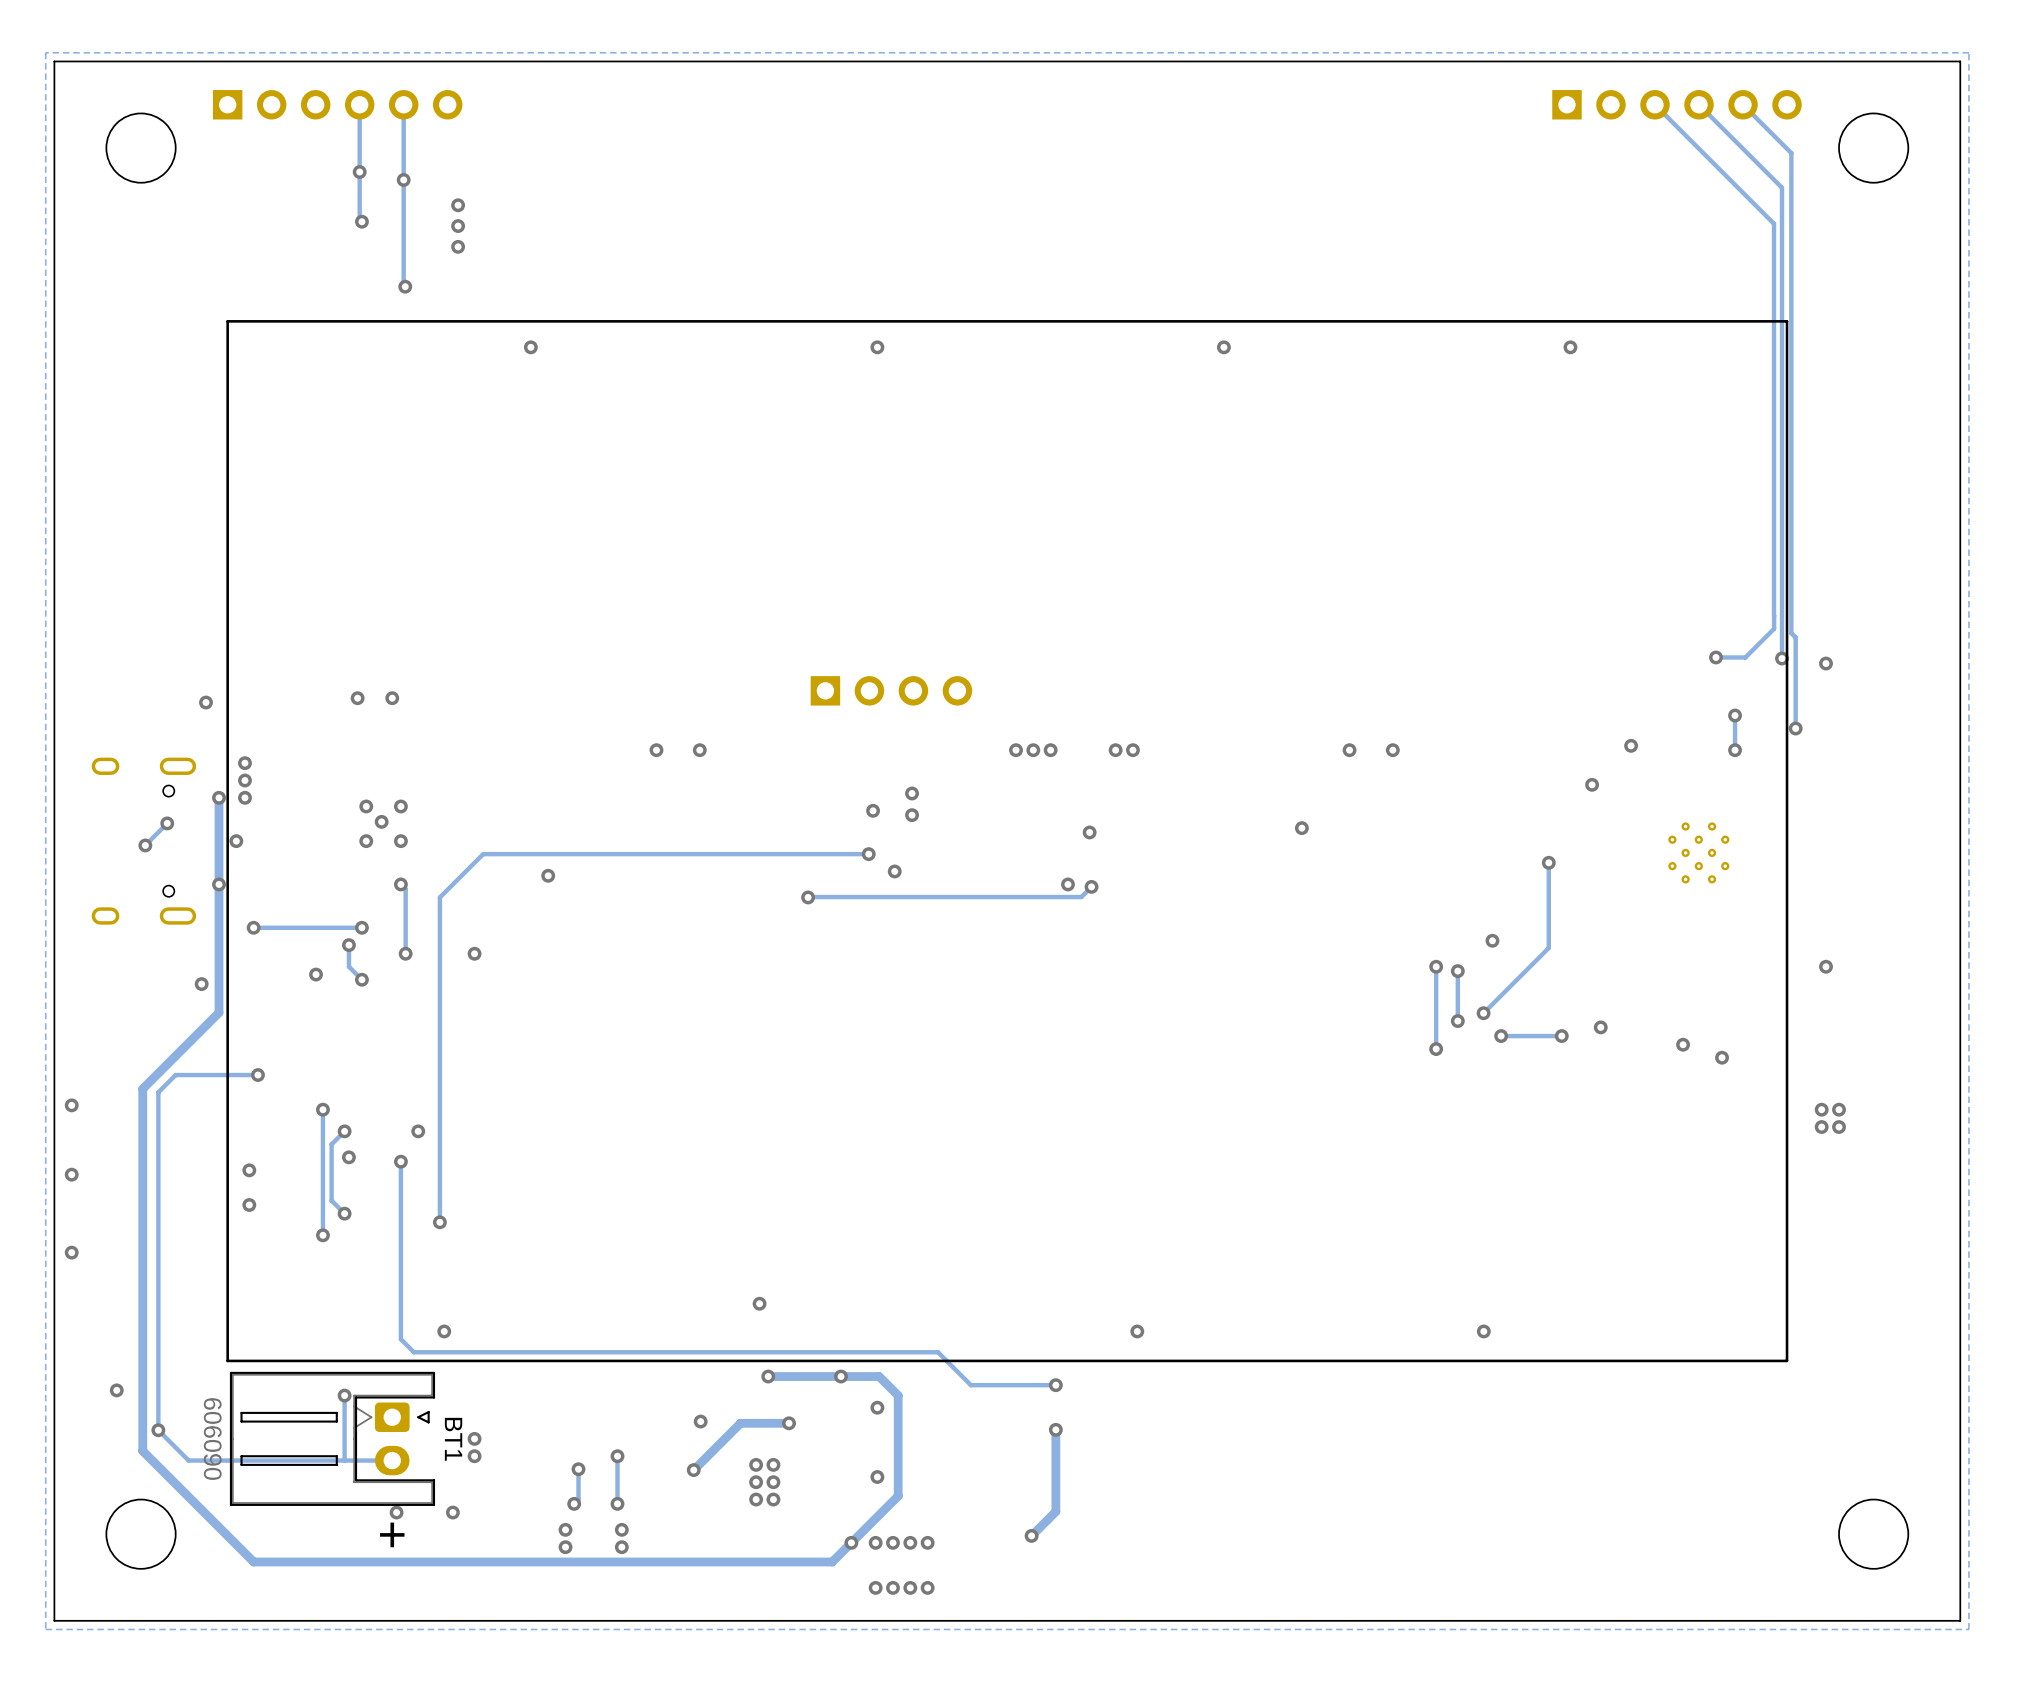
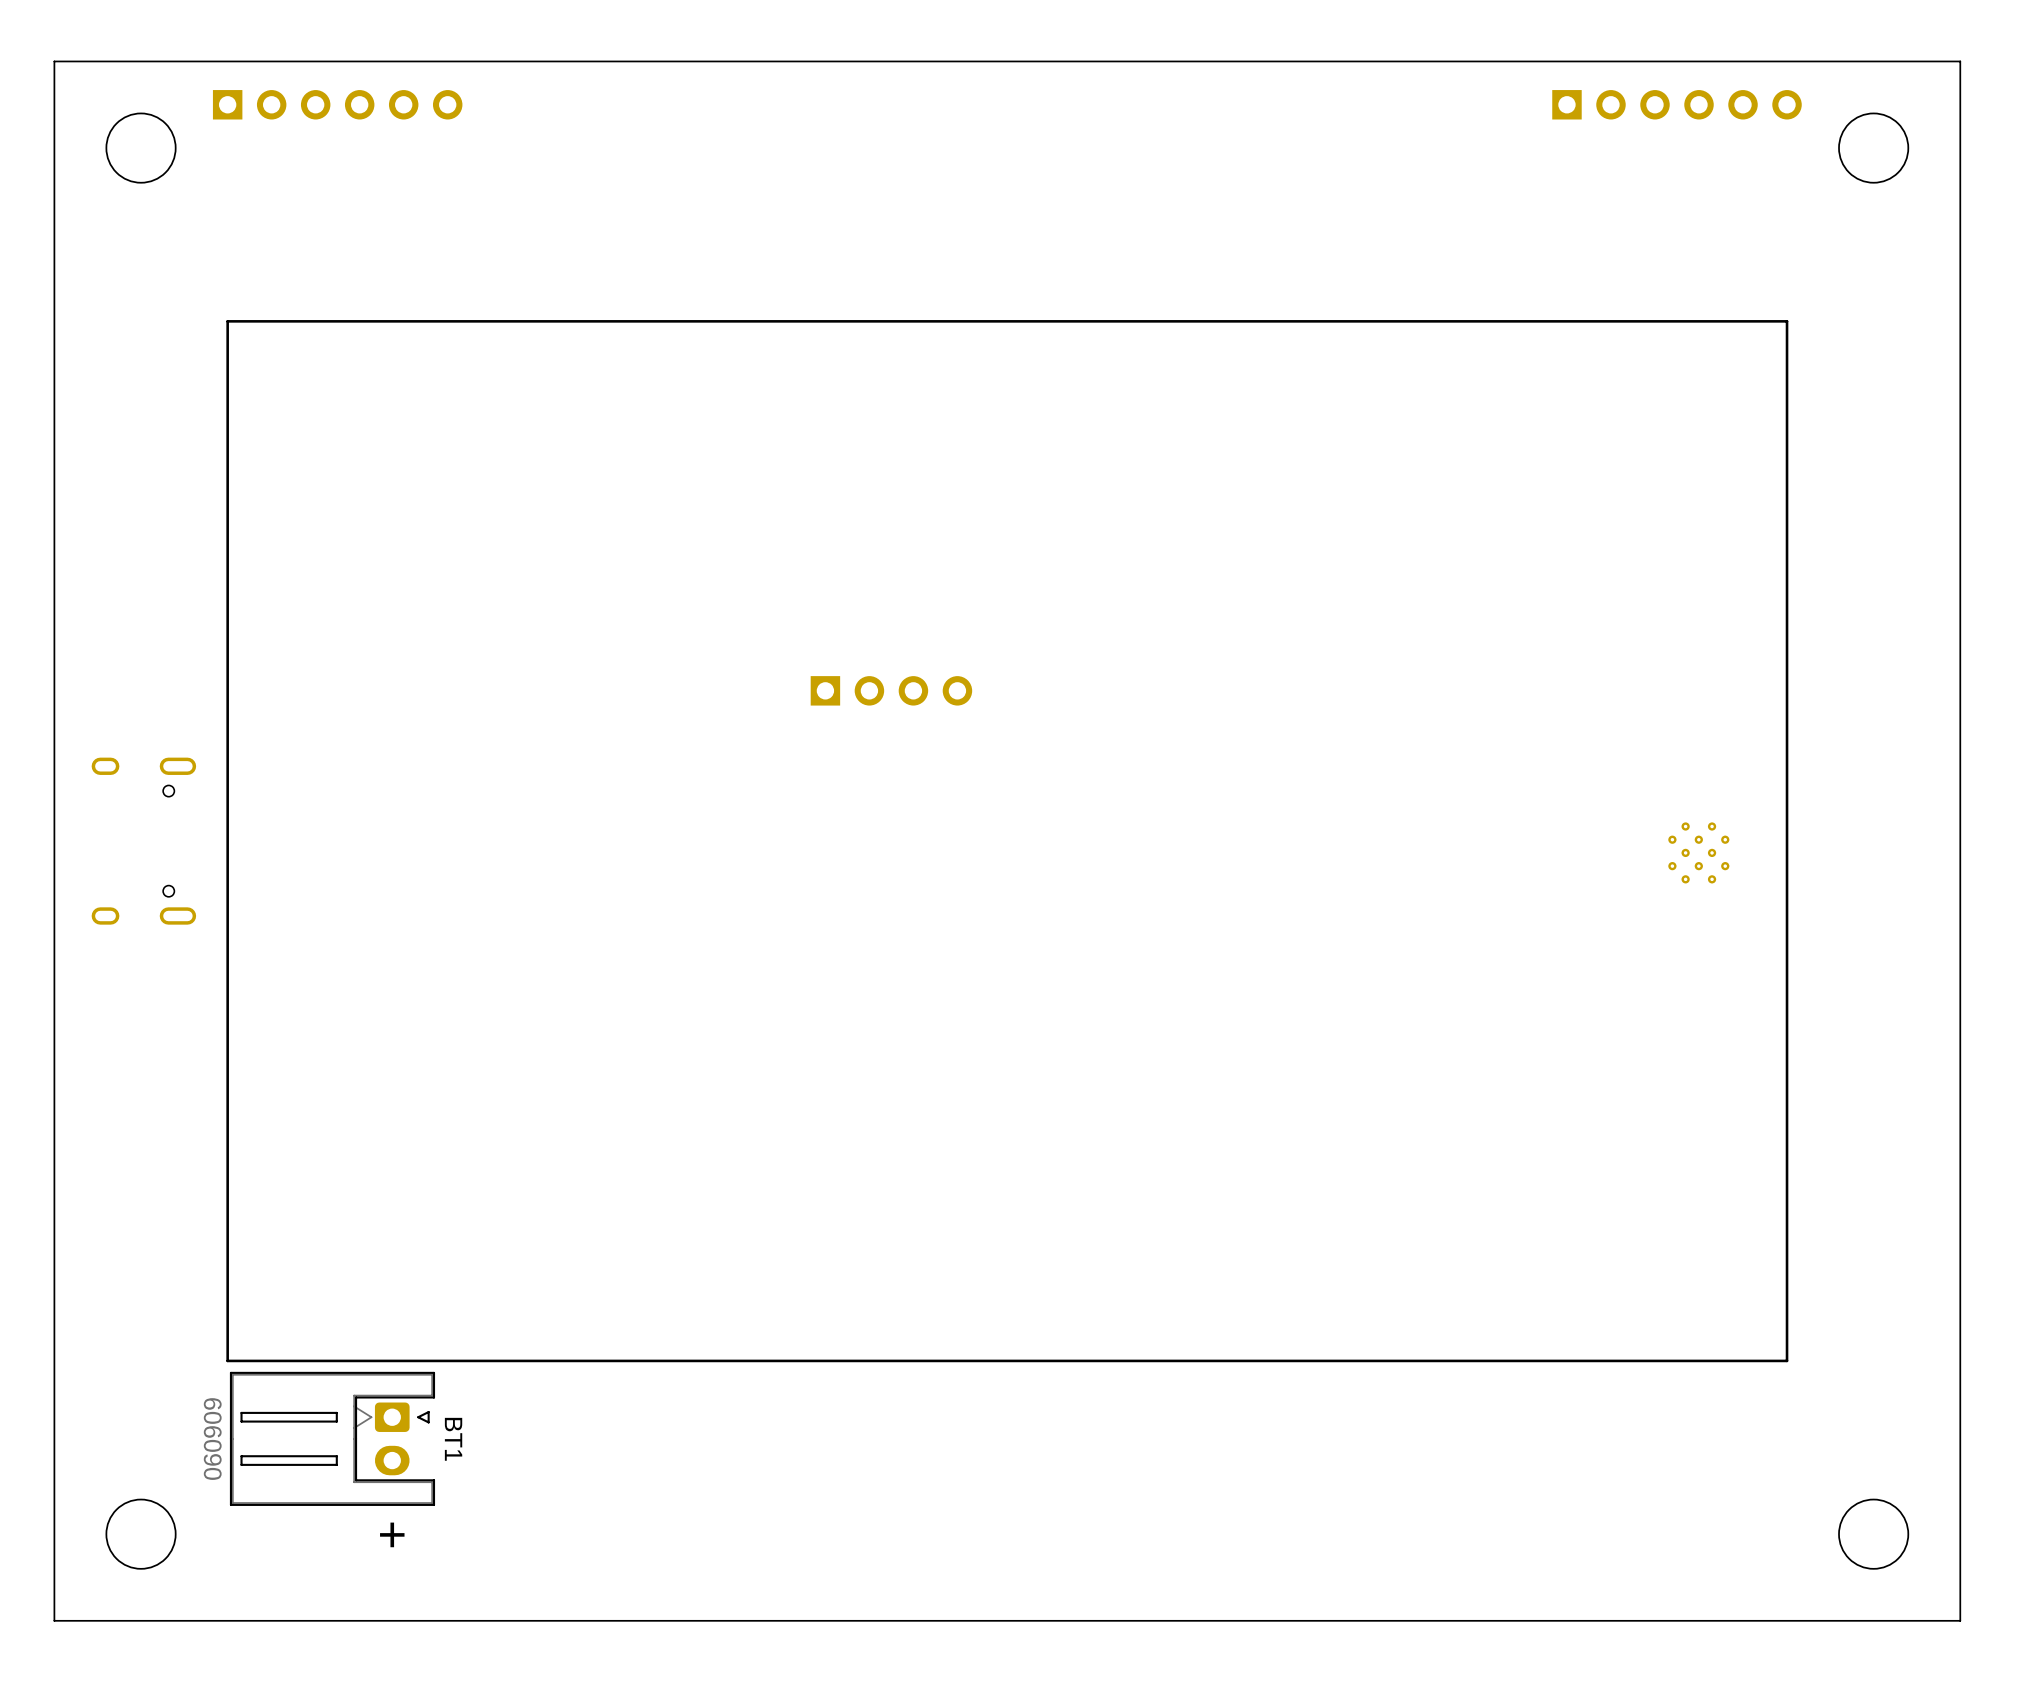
zone outline: (1968, 52) (1968, 1629) (45, 1629) (45, 52) (1968, 52) -> none
track: (359, 104) (359, 219) (361, 221) -> none
track: (403, 104) (403, 285) (405, 286) -> none
track: (1654, 104) (1774, 223) (1774, 615) -> none
track: (1699, 104) (1782, 187) (1782, 658) -> none
track: (1743, 104) (1791, 153) (1791, 633) (1795, 637) (1795, 728) -> none
via: (359, 172) -> none
via: (403, 179) -> none
via: (458, 205) -> none
via: (361, 221) -> none
via: (458, 226) -> none
via: (458, 246) -> none
via: (405, 286) -> none
via: (530, 347) -> none
via: (877, 347) -> none
via: (1223, 347) -> none
via: (1570, 347) -> none
track: (1774, 615) (1774, 628) (1745, 657) (1715, 657) -> none
via: (1715, 657) -> none
via: (1782, 658) -> none
via: (1826, 663) -> none
via: (357, 698) -> none
via: (392, 698) -> none
via: (206, 702) -> none
track: (1735, 715) (1735, 750) -> none
via: (1735, 715) -> none
via: (1795, 728) -> none
via: (1631, 745) -> none
via: (656, 750) -> none
via: (699, 750) -> none
via: (1016, 750) -> none
via: (1033, 750) -> none
via: (1050, 750) -> none
via: (1115, 750) -> none
via: (1132, 750) -> none
via: (1349, 750) -> none
via: (1392, 750) -> none
via: (1735, 750) -> none
via: (244, 763) -> none
via: (244, 780) -> none
via: (1592, 784) -> none
via: (912, 793) -> none
track: (218, 797) (218, 1012) (142, 1088) (142, 1451) (253, 1561) (832, 1561) (898, 1496) (898, 1395) (879, 1376) (768, 1376) -> none
via: (218, 797) -> none
via: (244, 797) -> none
via: (366, 806) -> none
via: (400, 806) -> none
via: (873, 810) -> none
via: (912, 815) -> none
via: (381, 821) -> none
track: (167, 823) (145, 845) -> none
via: (167, 823) -> none
via: (1301, 828) -> none
via: (1089, 832) -> none
via: (236, 841) -> none
via: (366, 841) -> none
via: (400, 841) -> none
via: (145, 845) -> none
track: (868, 854) (483, 854) (439, 897) (439, 1222) -> none
via: (868, 854) -> none
track: (1548, 862) (1548, 947) (1483, 1013) -> none
via: (1548, 862) -> none
via: (894, 871) -> none
via: (548, 875) -> none
via: (218, 884) -> none
track: (400, 884) (405, 889) (405, 953) -> none
via: (400, 884) -> none
via: (1067, 884) -> none
track: (1091, 886) (1081, 897) (808, 897) -> none
via: (1091, 886) -> none
via: (808, 897) -> none
via: (253, 927) -> none
track: (361, 927) (253, 927) -> none
via: (361, 927) -> none
via: (1492, 940) -> none
track: (348, 945) (348, 966) (361, 979) -> none
via: (348, 945) -> none
via: (405, 953) -> none
via: (474, 953) -> none
track: (1436, 966) (1436, 1049) -> none
via: (1436, 966) -> none
via: (1826, 966) -> none
track: (1457, 971) (1457, 1021) -> none
via: (1457, 971) -> none
via: (316, 974) -> none
via: (361, 979) -> none
via: (201, 984) -> none
via: (1483, 1013) -> none
via: (1457, 1021) -> none
via: (1600, 1027) -> none
via: (1501, 1036) -> none
track: (1561, 1036) (1501, 1036) -> none
via: (1561, 1036) -> none
via: (1683, 1044) -> none
via: (1436, 1049) -> none
via: (1722, 1057) -> none
track: (257, 1075) (175, 1075) (158, 1092) (158, 1430) (188, 1460) (392, 1460) -> none
via: (257, 1075) -> none
via: (71, 1105) -> none
track: (322, 1109) (322, 1235) -> none
via: (322, 1109) -> none
via: (1821, 1109) -> none
via: (1839, 1109) -> none
via: (1821, 1127) -> none
via: (1839, 1127) -> none
track: (344, 1131) (331, 1144) (331, 1200) (344, 1213) -> none
via: (344, 1131) -> none
via: (418, 1131) -> none
via: (348, 1157) -> none
track: (400, 1161) (400, 1339) (413, 1352) (938, 1352) (970, 1385) (1055, 1385) -> none
via: (400, 1161) -> none
via: (249, 1170) -> none
via: (71, 1174) -> none
via: (249, 1204) -> none
via: (344, 1213) -> none
via: (439, 1222) -> none
via: (322, 1235) -> none
via: (71, 1252) -> none
via: (759, 1303) -> none
via: (444, 1331) -> none
via: (1137, 1331) -> none
via: (1483, 1331) -> none
via: (768, 1376) -> none
via: (841, 1376) -> none
via: (1055, 1385) -> none
via: (116, 1390) -> none
track: (344, 1395) (344, 1460) -> none
via: (344, 1395) -> none
via: (877, 1407) -> none
via: (700, 1421) -> none
track: (789, 1423) (740, 1423) (693, 1470) -> none
via: (789, 1423) -> none
track: (1055, 1429) (1055, 1511) (1031, 1535) -> none
via: (1055, 1429) -> none
via: (158, 1430) -> none
via: (474, 1438) -> none
via: (474, 1456) -> none
track: (617, 1456) (617, 1503) -> none
via: (617, 1456) -> none
via: (756, 1464) -> none
via: (773, 1464) -> none
track: (578, 1469) (578, 1499) (574, 1503) -> none
via: (578, 1469) -> none
via: (693, 1470) -> none
via: (877, 1477) -> none
via: (756, 1482) -> none
via: (773, 1482) -> none
via: (756, 1499) -> none
via: (773, 1499) -> none
via: (574, 1503) -> none
via: (617, 1503) -> none
via: (396, 1512) -> none
via: (452, 1512) -> none
via: (565, 1529) -> none
via: (621, 1529) -> none
via: (1031, 1535) -> none
via: (851, 1542) -> none
via: (875, 1542) -> none
via: (892, 1542) -> none
via: (910, 1542) -> none
via: (927, 1542) -> none
via: (565, 1547) -> none
via: (621, 1547) -> none
via: (875, 1587) -> none
via: (892, 1587) -> none
via: (910, 1587) -> none
via: (927, 1587) -> none

